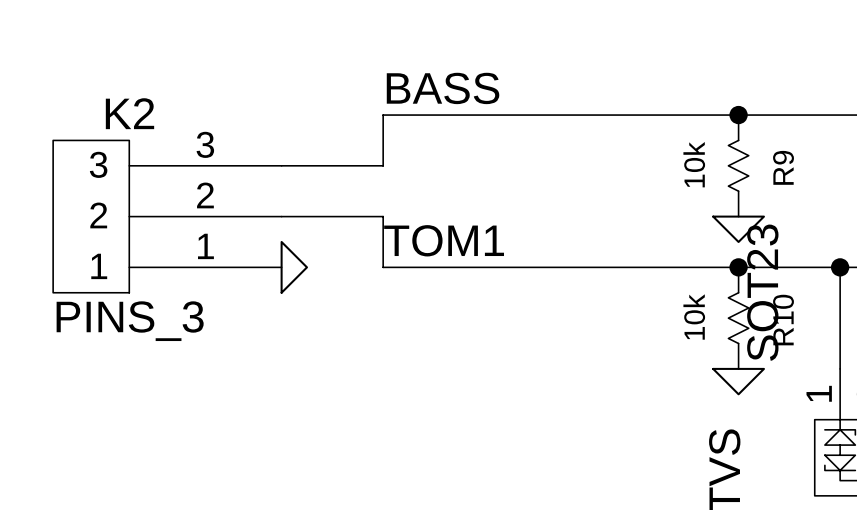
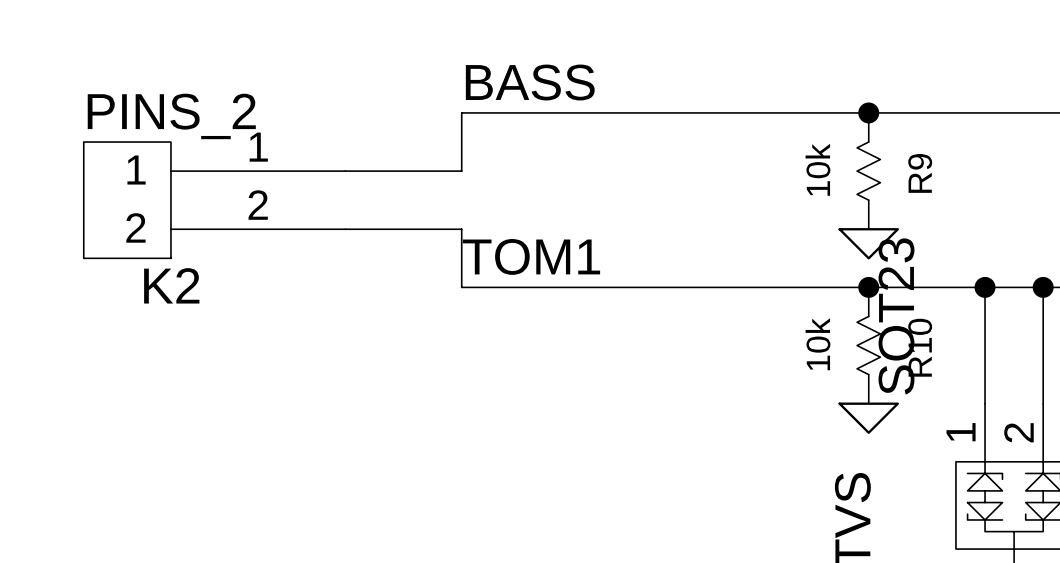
K2 name position: K2 (129, 113) -> K2 (171, 285)
K2 symbol: [53, 140, 282, 293] -> [83, 142, 346, 259]
power symbol: (294, 267) -> none
K2 value: PINS_3 (130, 321) -> PINS_2 (171, 116)

